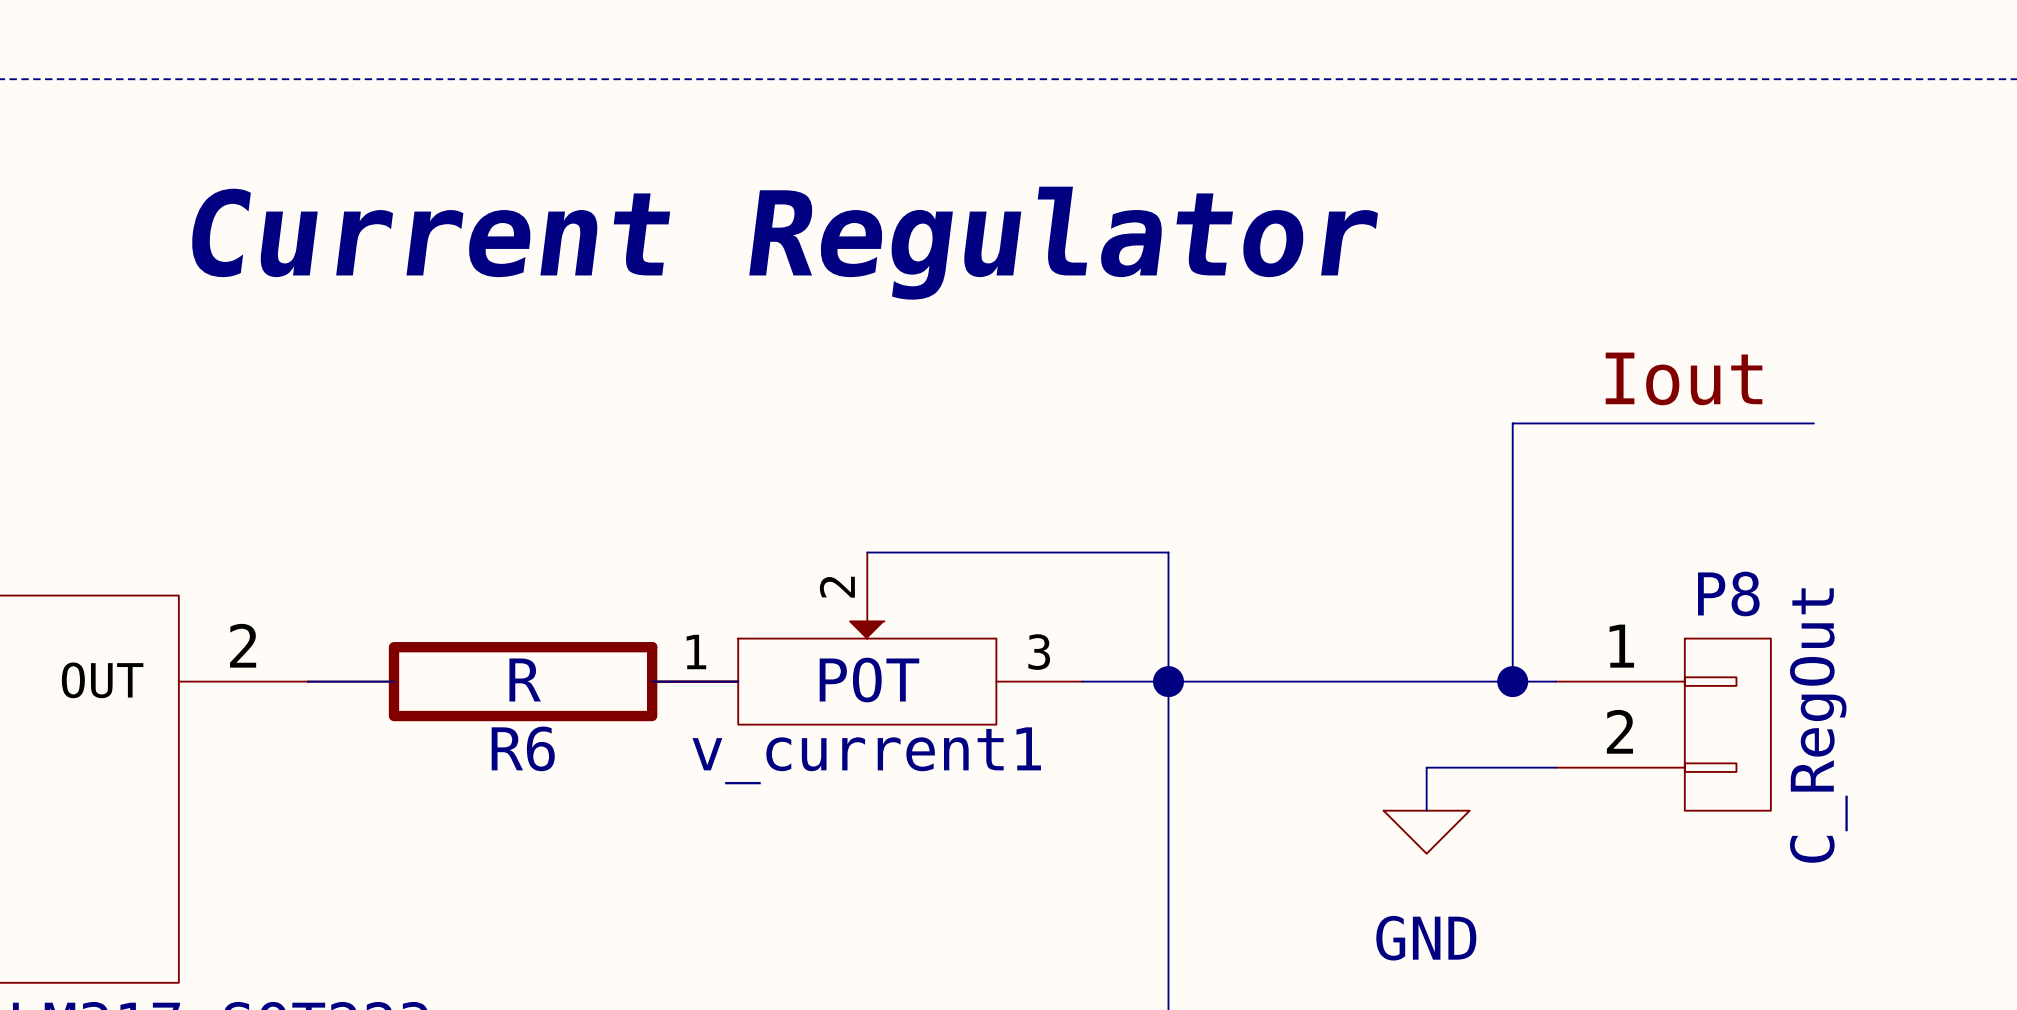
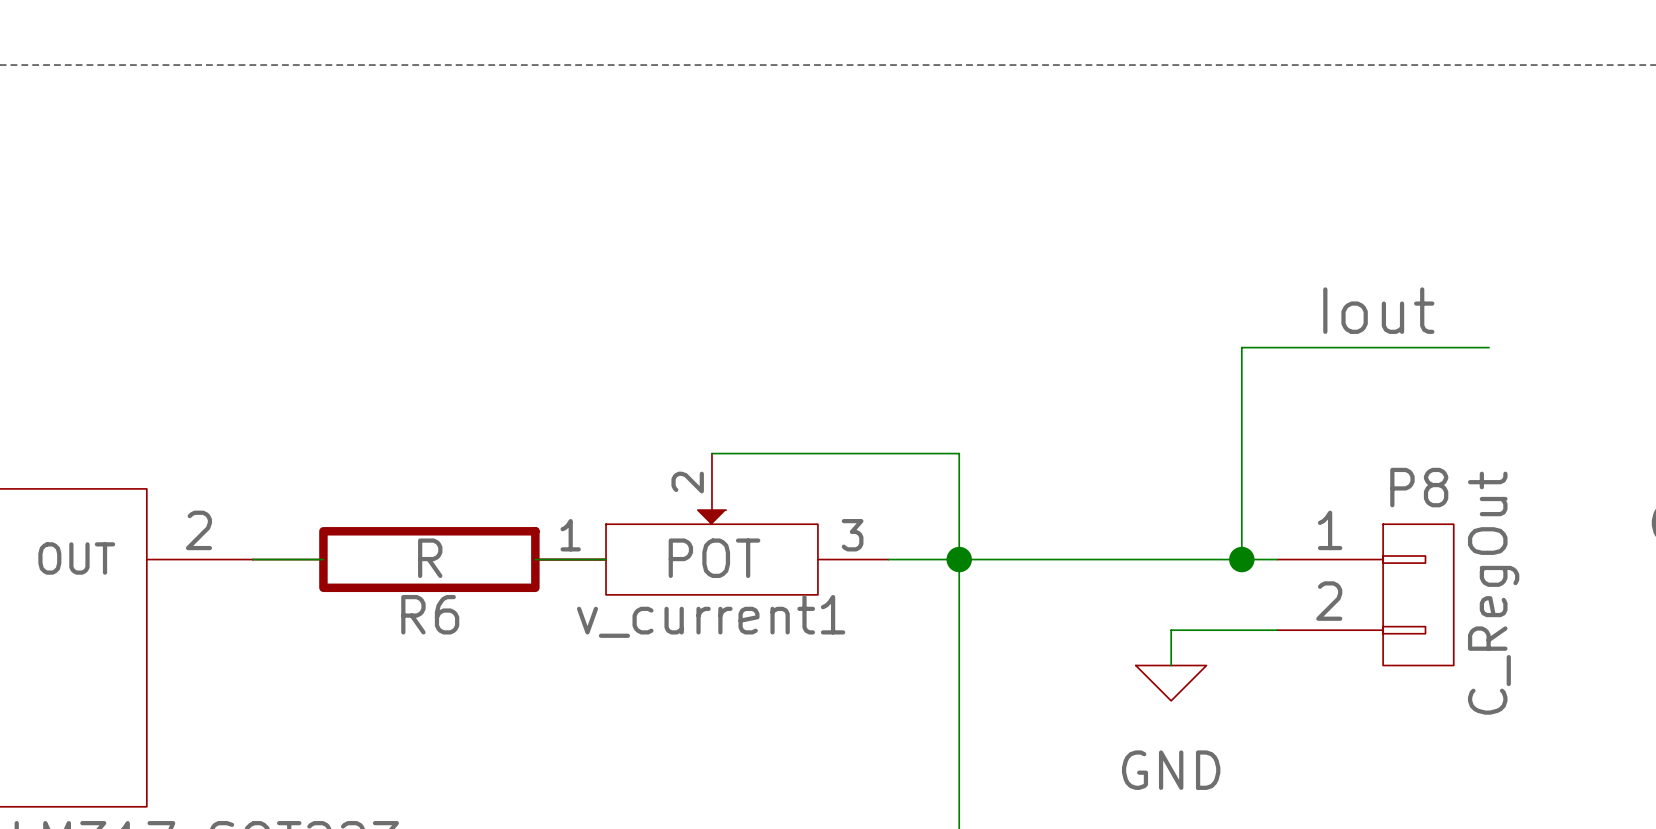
text: Current Regulator (784, 243) -> none

